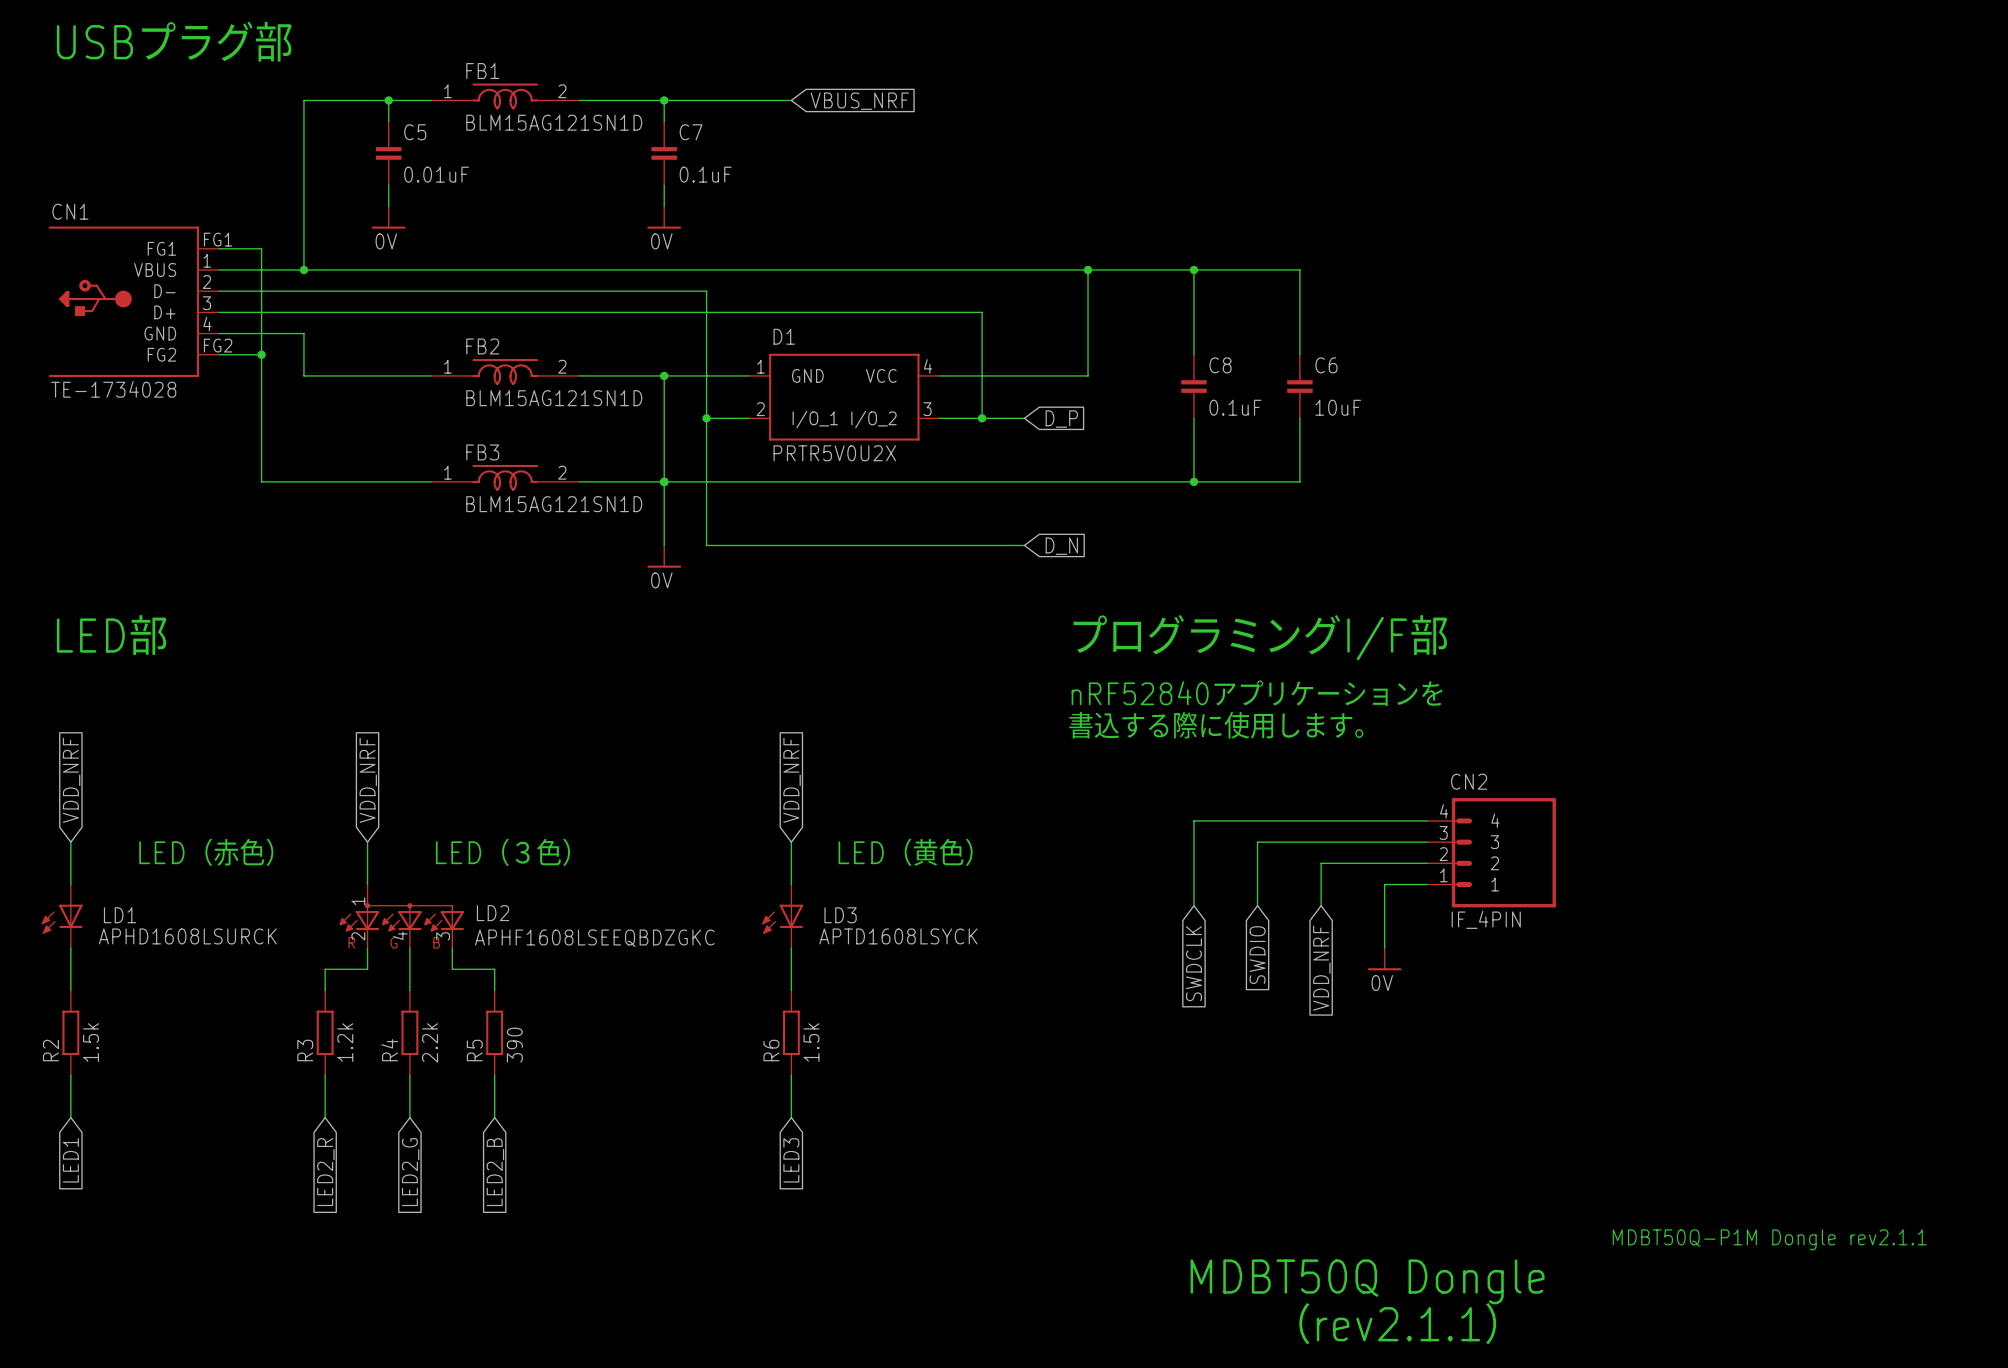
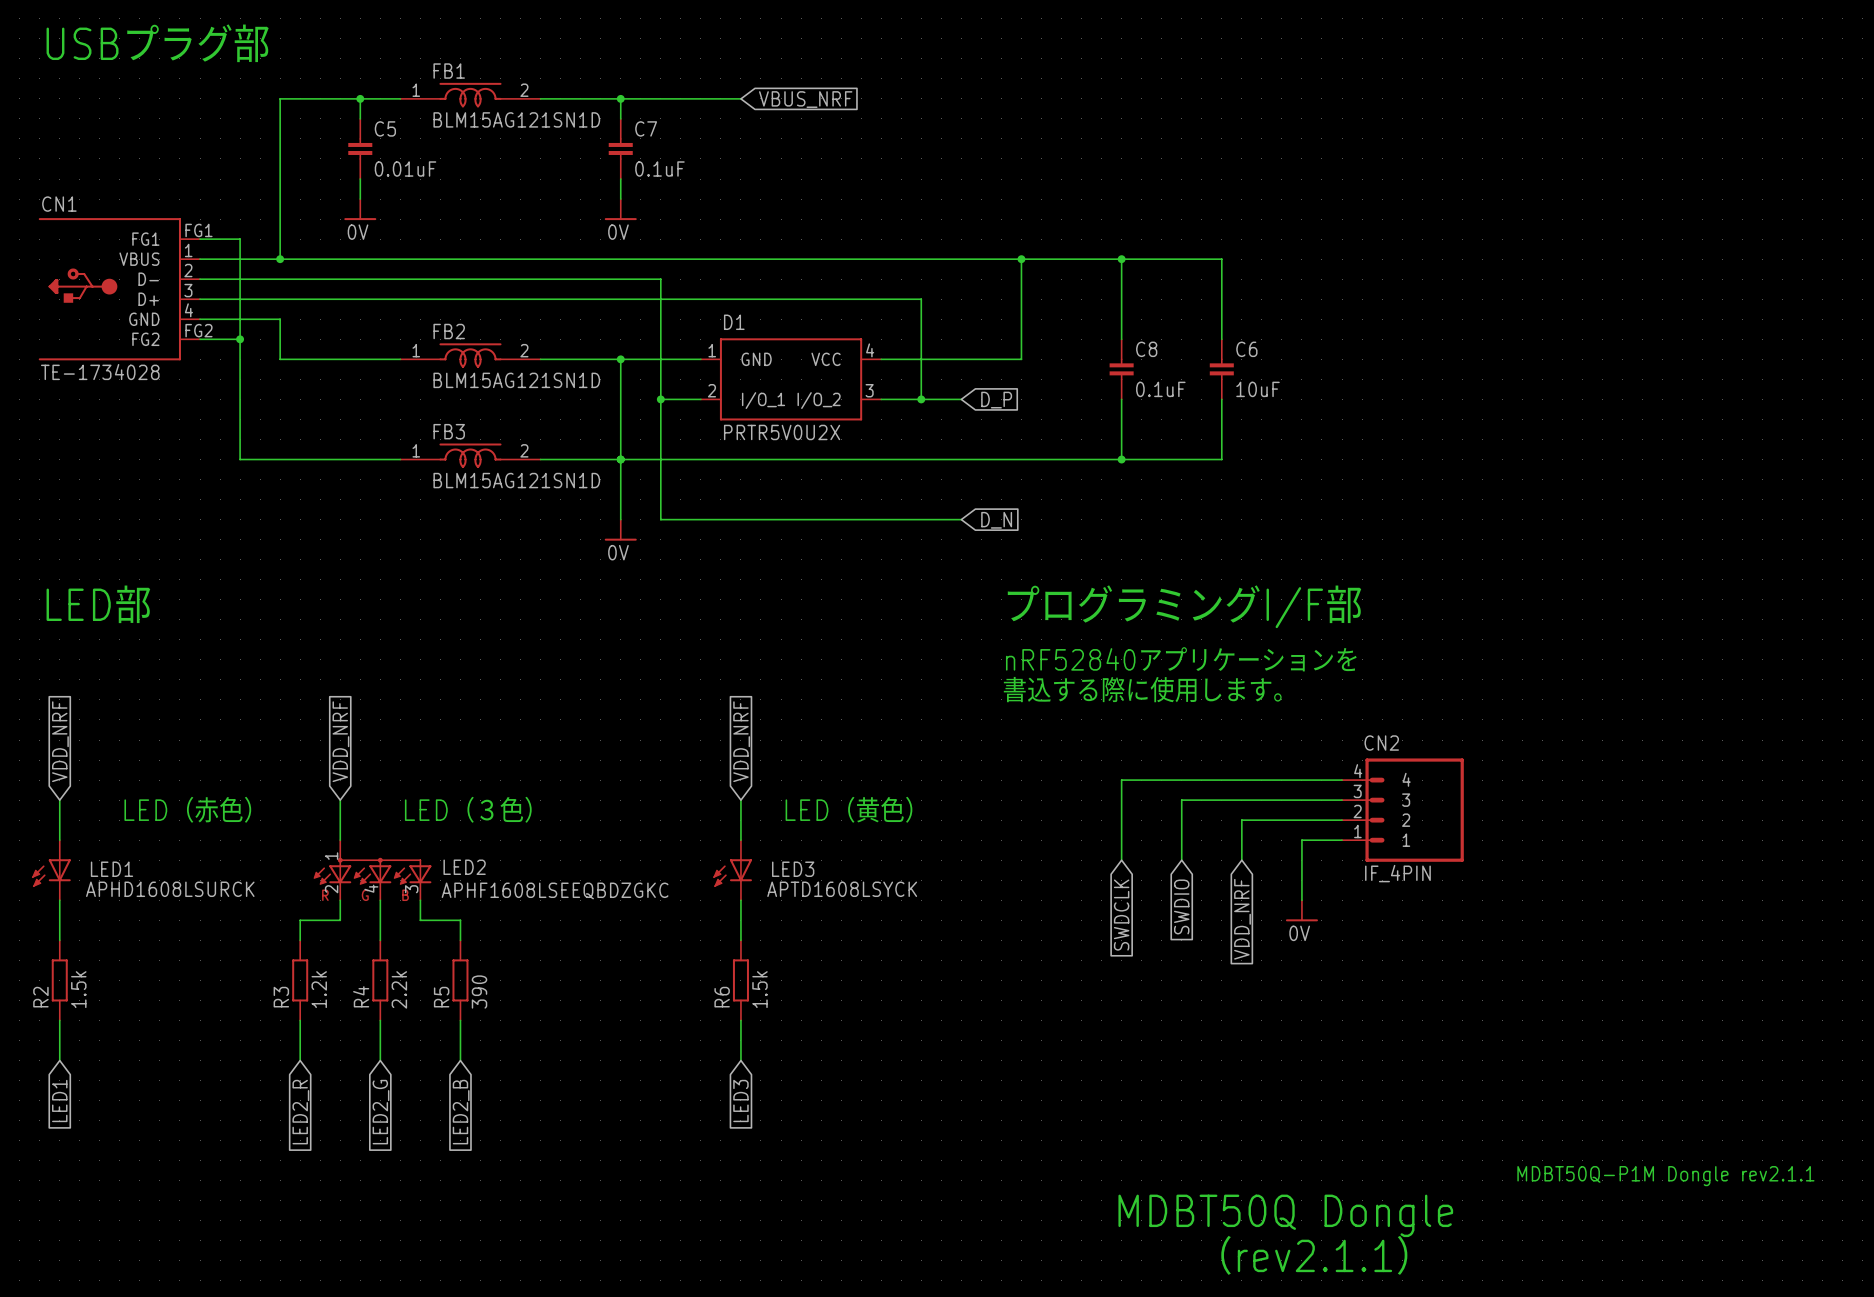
LD2 name: LD2 (493, 913) -> LED2 (464, 867)
LD1 name: LD1 (120, 915) -> LED1 (111, 869)
LD3 name: LD3 (840, 915) -> LED3 (793, 869)

